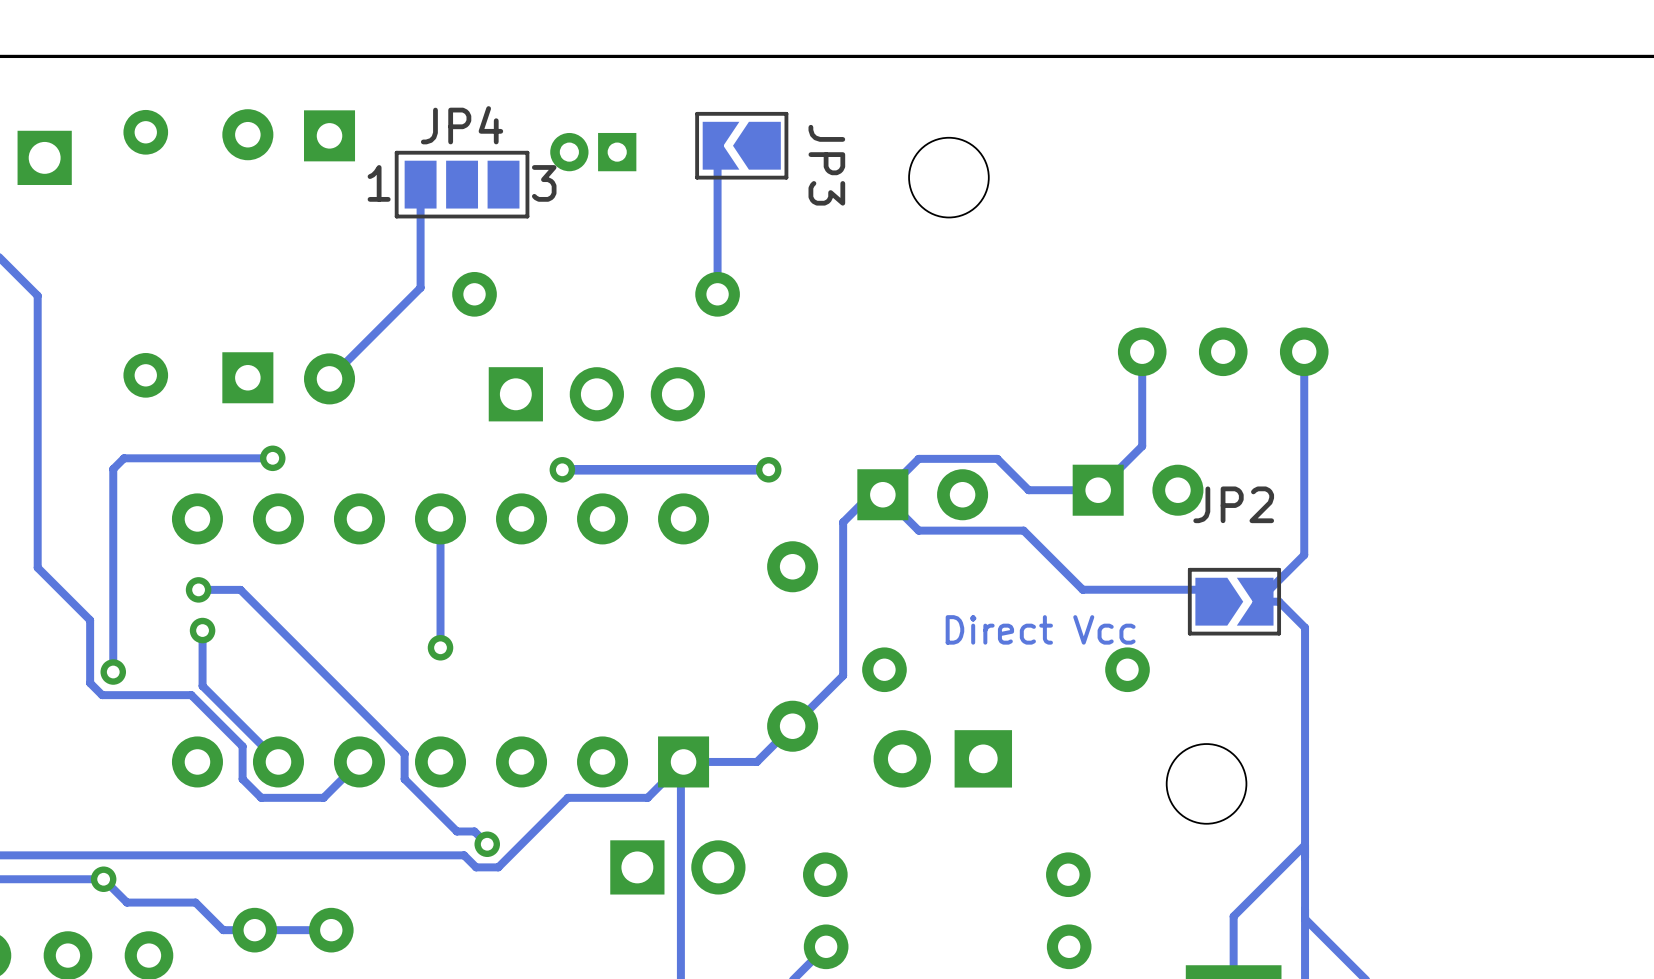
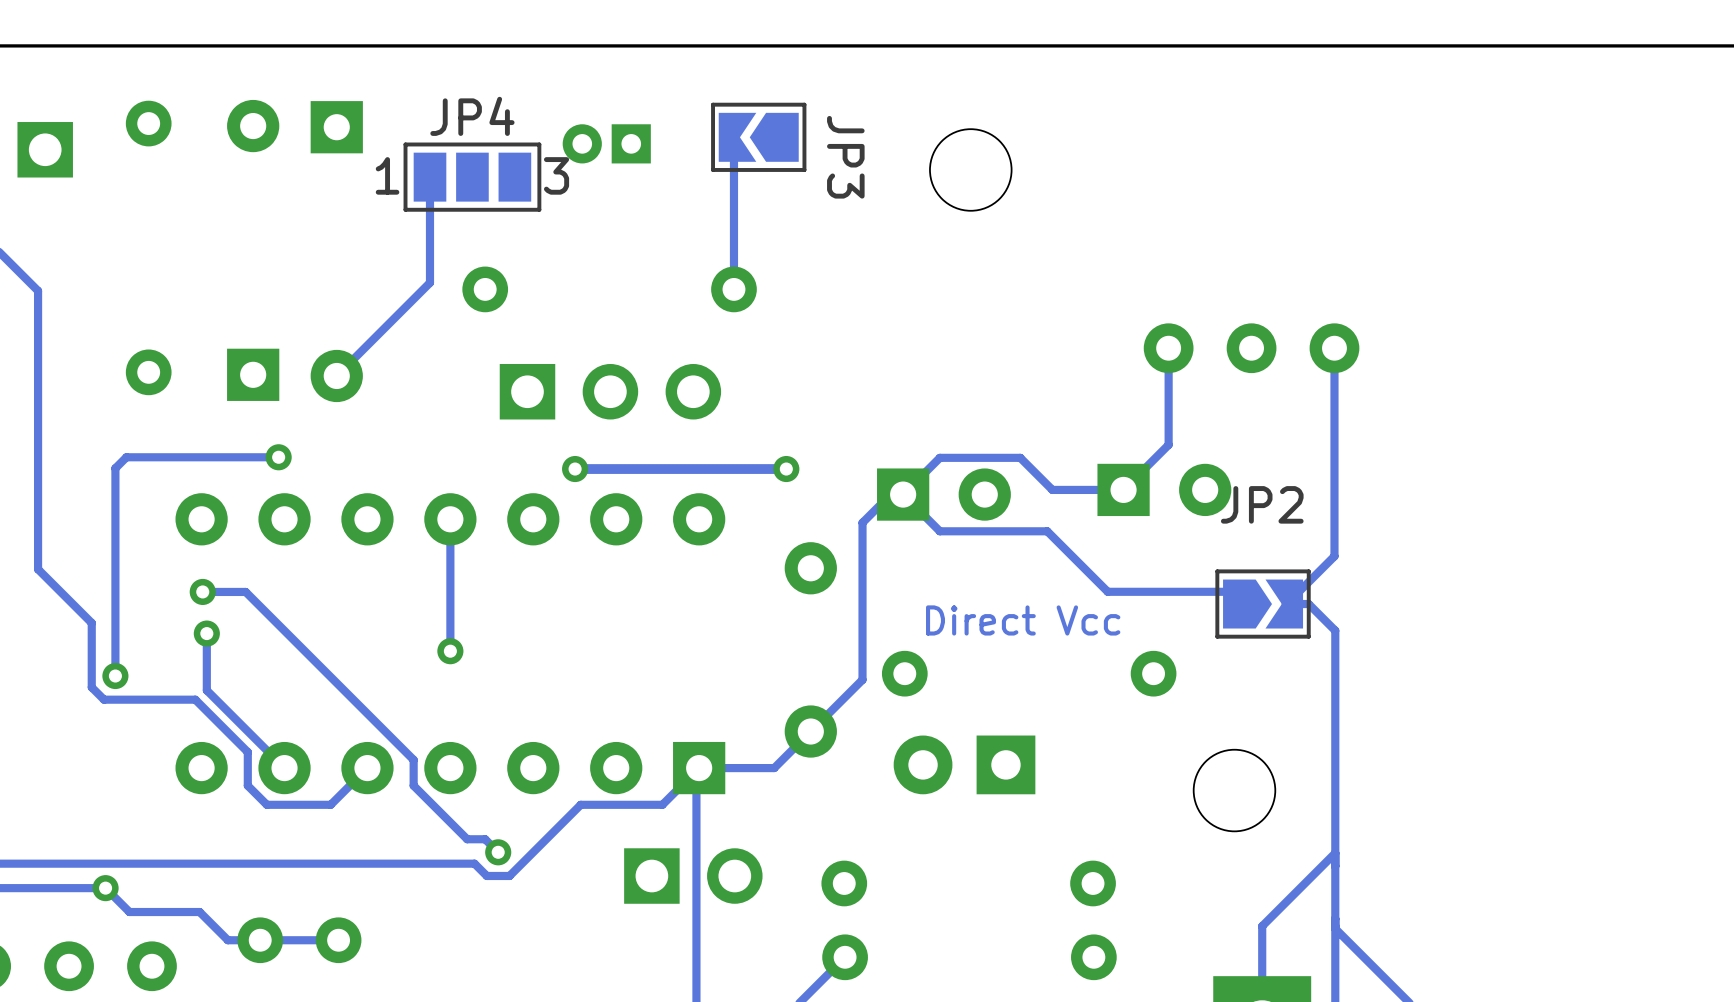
text position: Direct Vcc (1040, 629) -> Direct Vcc (1023, 620)

